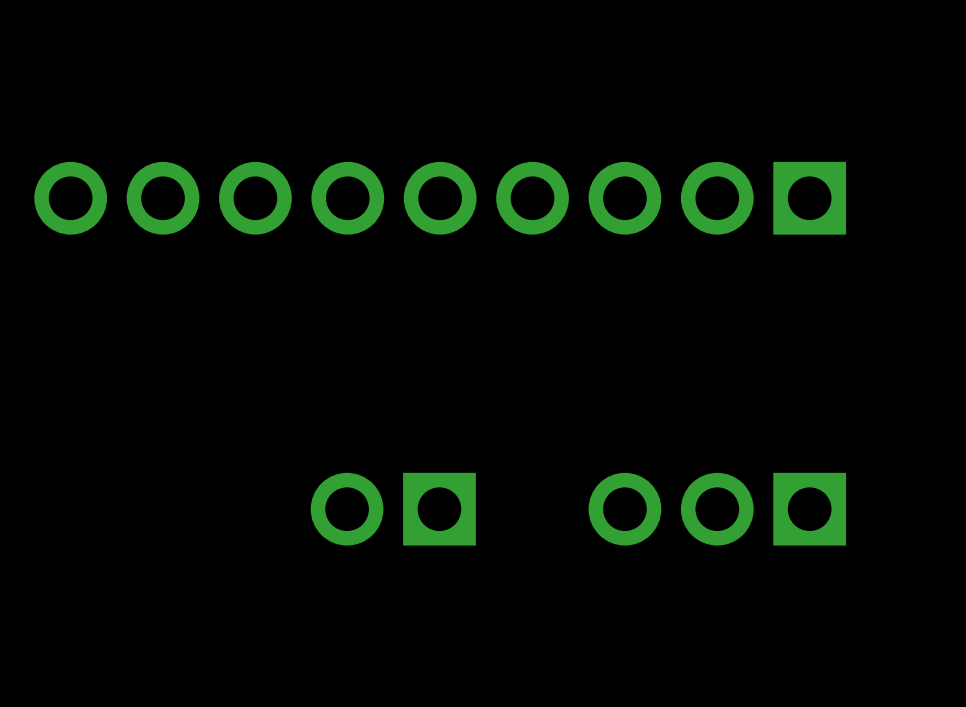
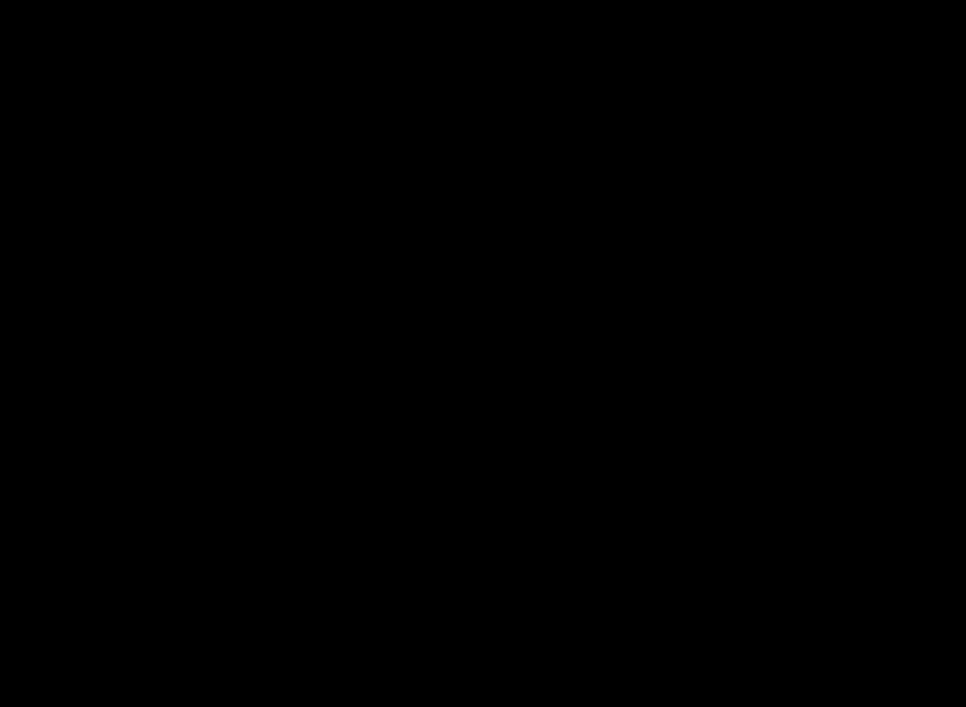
part: (440, 198) -> none
part: (393, 509) -> none
part: (717, 509) -> none

